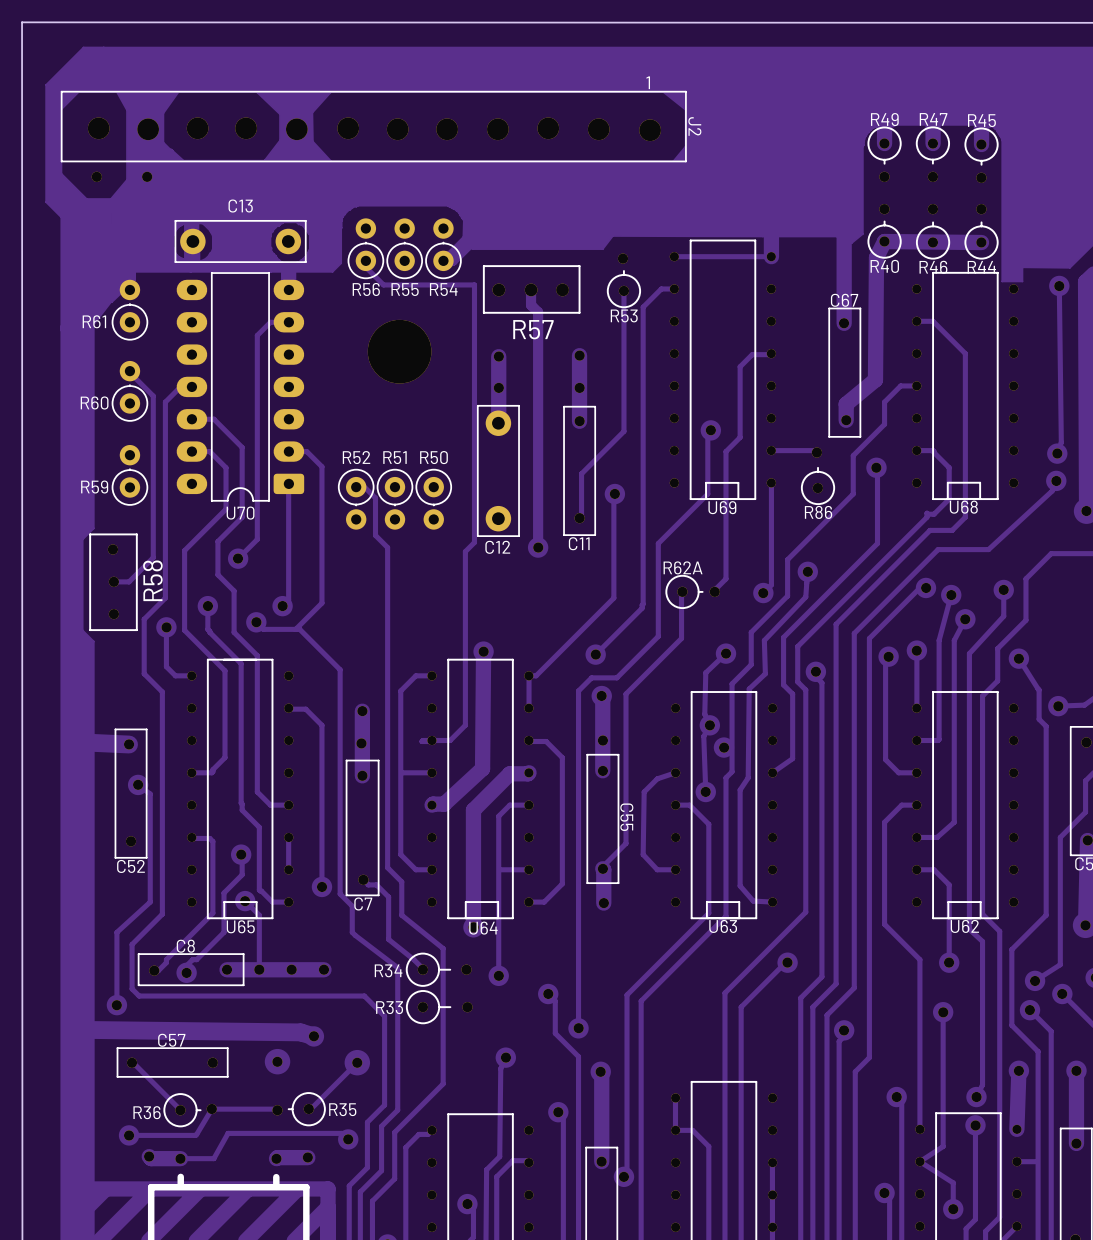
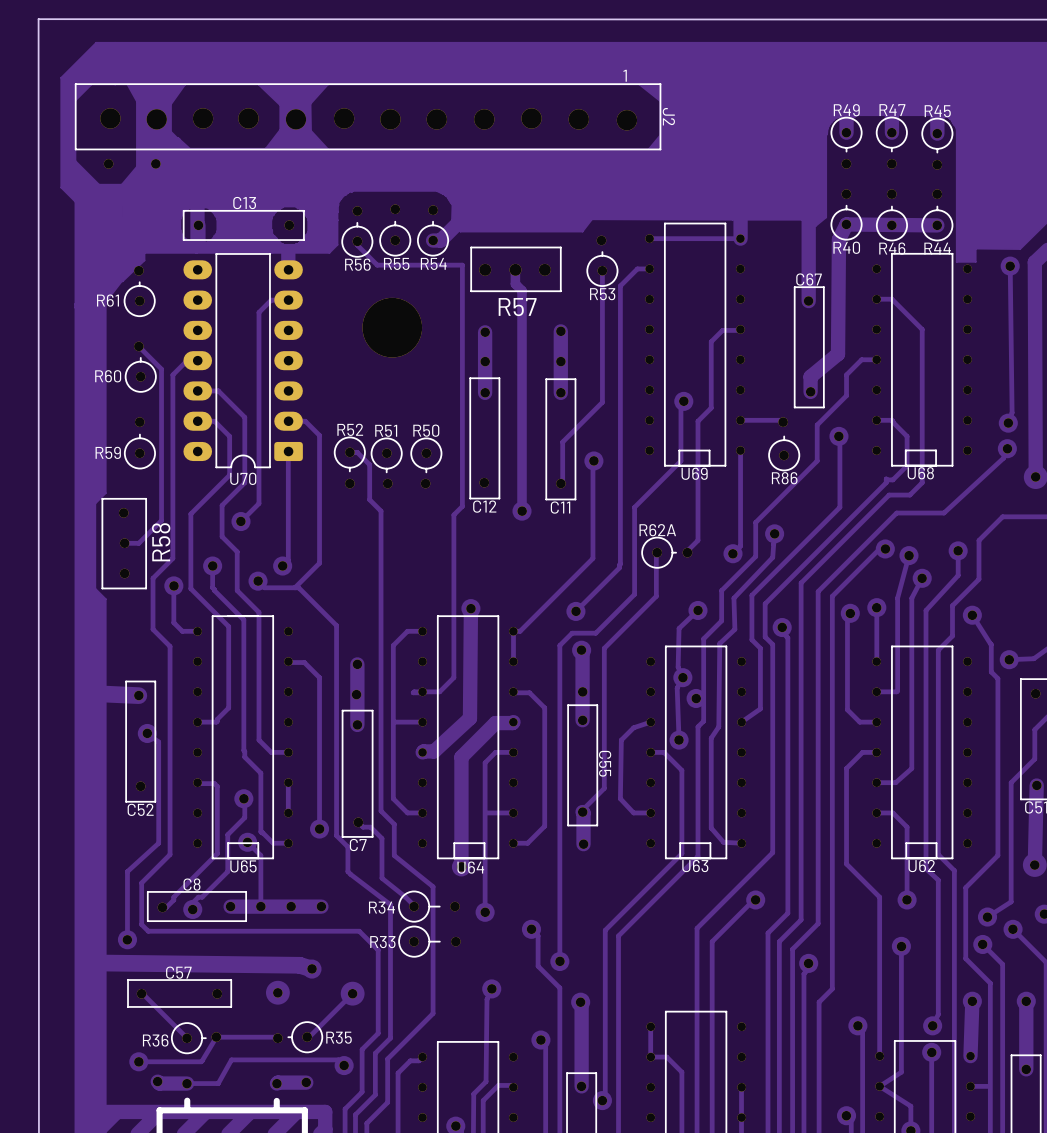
text: none -> C13 (244, 203)
via: none -> (395, 209)
line: none -> (183, 210) (303, 210) (303, 240) (183, 240) (183, 210)
via: none -> (433, 210)
via: none -> (357, 211)
line: none -> (395, 221) (395, 225)
line: none -> (433, 221) (433, 225)
line: none -> (357, 222) (357, 226)
C13: (240, 241) -> none
drawing: none -> [341, 224, 450, 258]
via: none -> (198, 225)
via: none -> (289, 225)
R56: (365, 248) -> none
R55: (404, 248) -> none
R54: (443, 248) -> none
via: none -> (395, 240)
via: none -> (433, 240)
via: none -> (357, 241)
text: none -> R55 (396, 263)
text: none -> R54 (433, 263)
text: none -> R56 (357, 264)
via: none -> (138, 270)
line: none -> (139, 282) (139, 285)
drawing: none -> [123, 285, 156, 318]
R61: (129, 310) -> none
text: none -> R61 (107, 300)
via: none -> (139, 301)
via: none -> (138, 346)
line: none -> (140, 357) (140, 361)
drawing: none -> [124, 360, 157, 393]
R60: (129, 391) -> none
text: none -> R60 (108, 376)
via: none -> (140, 376)
line: none -> (470, 378) (499, 378) (499, 498) (470, 498) (470, 378)
via: none -> (485, 392)
via: none -> (139, 422)
text: none -> R52 (350, 429)
text: none -> R51 (386, 430)
text: none -> R50 (426, 430)
line: none -> (139, 434) (139, 438)
drawing: none -> [333, 436, 443, 470]
drawing: none -> [123, 437, 156, 470]
C12: (498, 470) -> none
R59: (129, 475) -> none
via: none -> (349, 452)
text: none -> R59 (108, 452)
via: none -> (139, 453)
via: none -> (386, 453)
via: none -> (426, 453)
R52: (356, 499) -> none
R51: (394, 499) -> none
R50: (433, 499) -> none
line: none -> (349, 467) (349, 471)
line: none -> (386, 468) (386, 472)
line: none -> (426, 468) (426, 472)
via: none -> (484, 482)
via: none -> (349, 483)
via: none -> (387, 483)
via: none -> (425, 483)
text: none -> C12 (484, 506)

